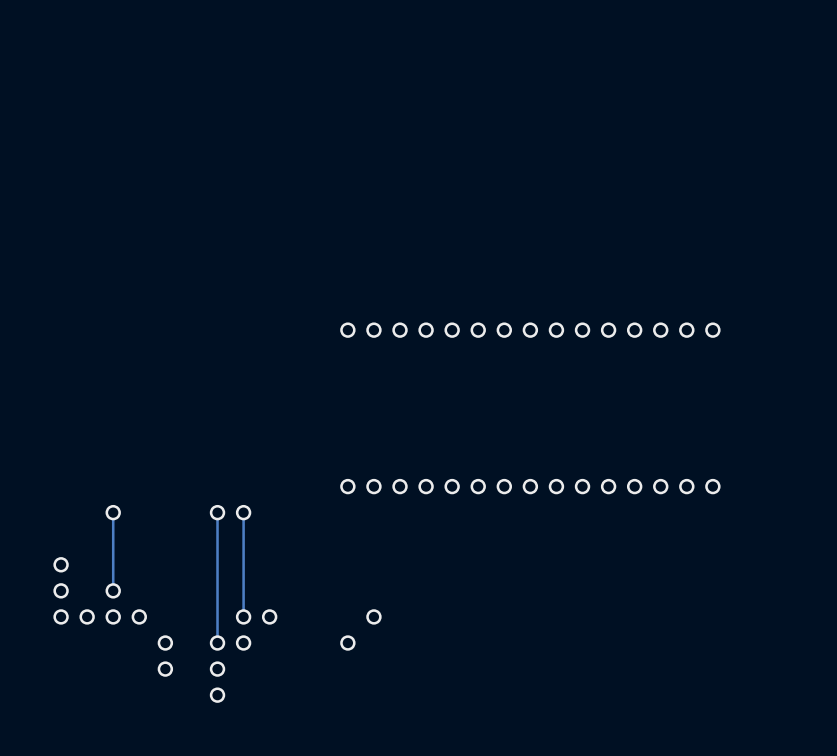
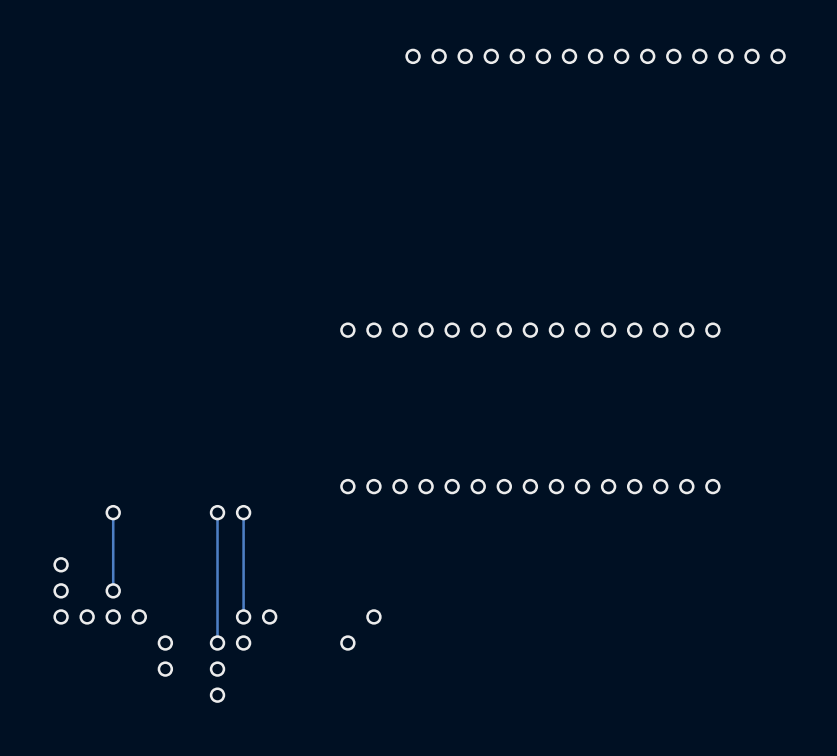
via: none -> (413, 56)
via: none -> (439, 56)
via: none -> (465, 56)
via: none -> (491, 56)
via: none -> (517, 56)
via: none -> (543, 56)
via: none -> (569, 56)
via: none -> (595, 56)
via: none -> (621, 56)
via: none -> (647, 56)
via: none -> (673, 56)
via: none -> (699, 56)
via: none -> (725, 56)
via: none -> (751, 56)
via: none -> (778, 56)

